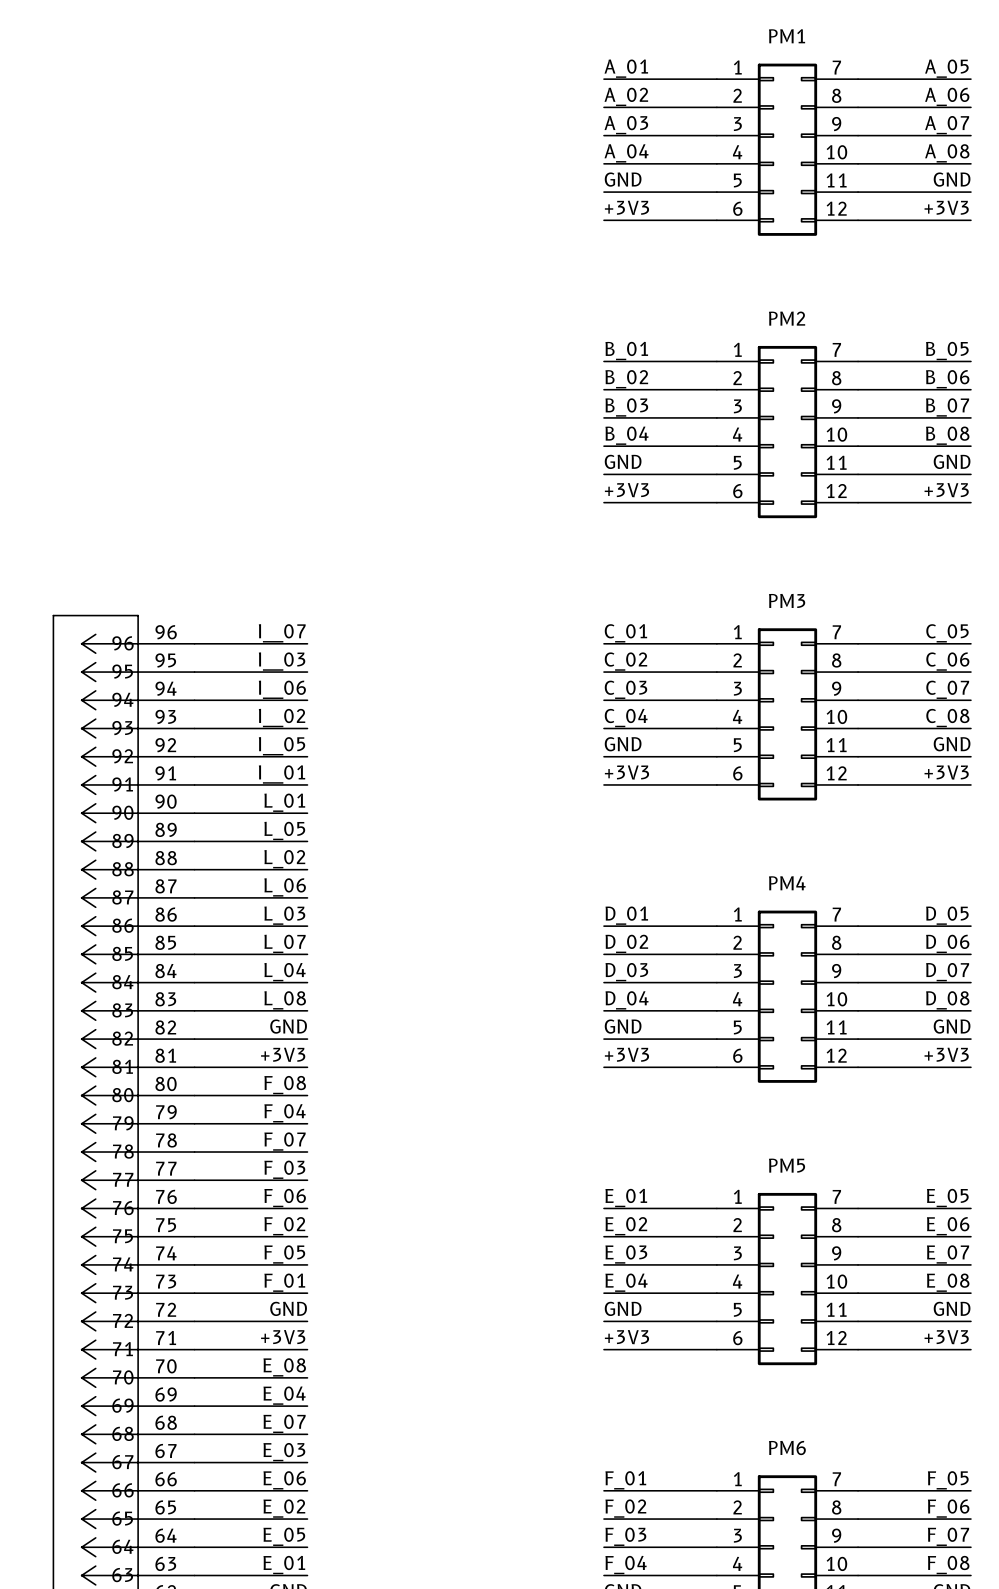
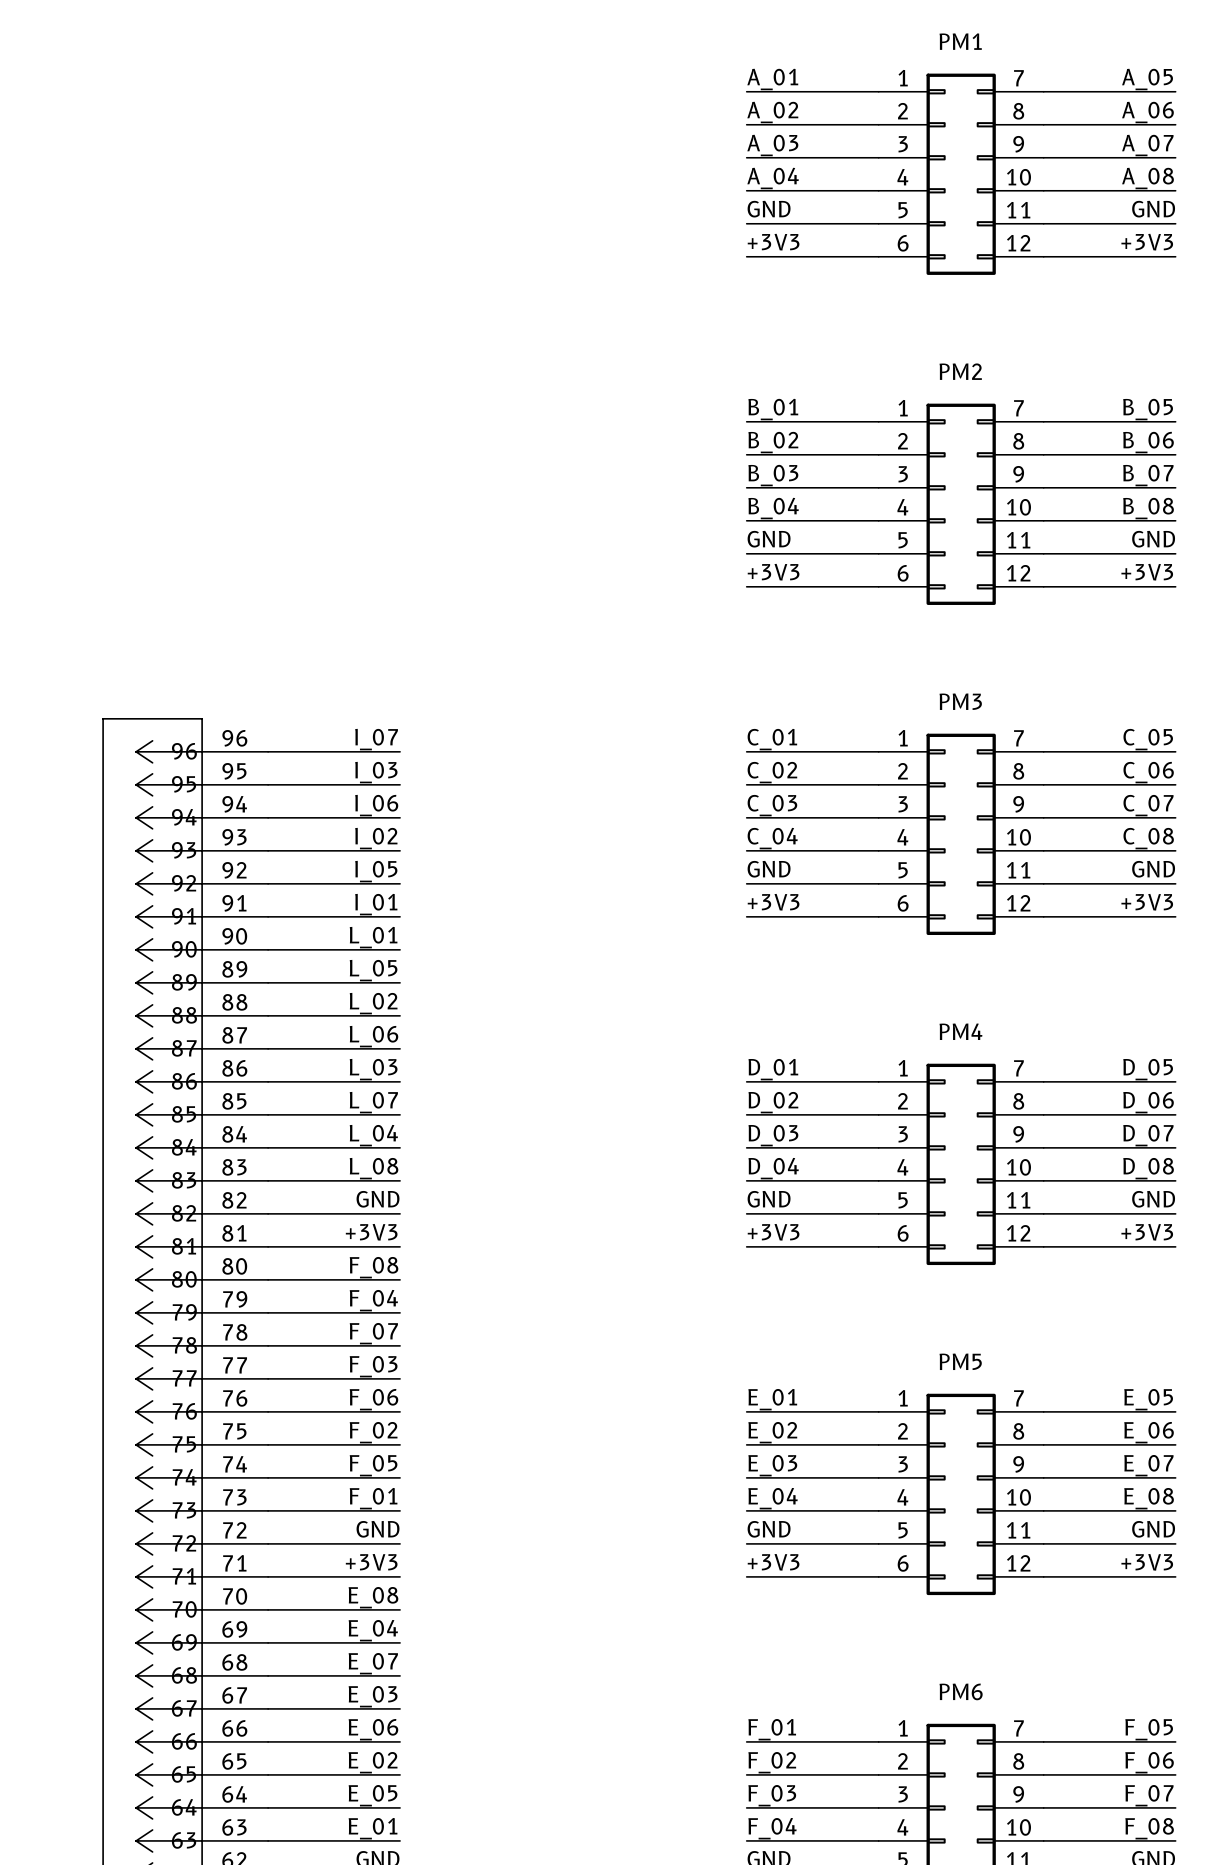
label: I__07 (282, 633) -> I_07 (376, 739)
label: I__03 (282, 661) -> I_03 (376, 772)
label: I__06 (282, 689) -> I_06 (376, 805)
label: I__02 (282, 718) -> I_02 (376, 838)
label: I__05 (282, 746) -> I_05 (376, 871)
label: I__01 (282, 774) -> I_01 (376, 904)

